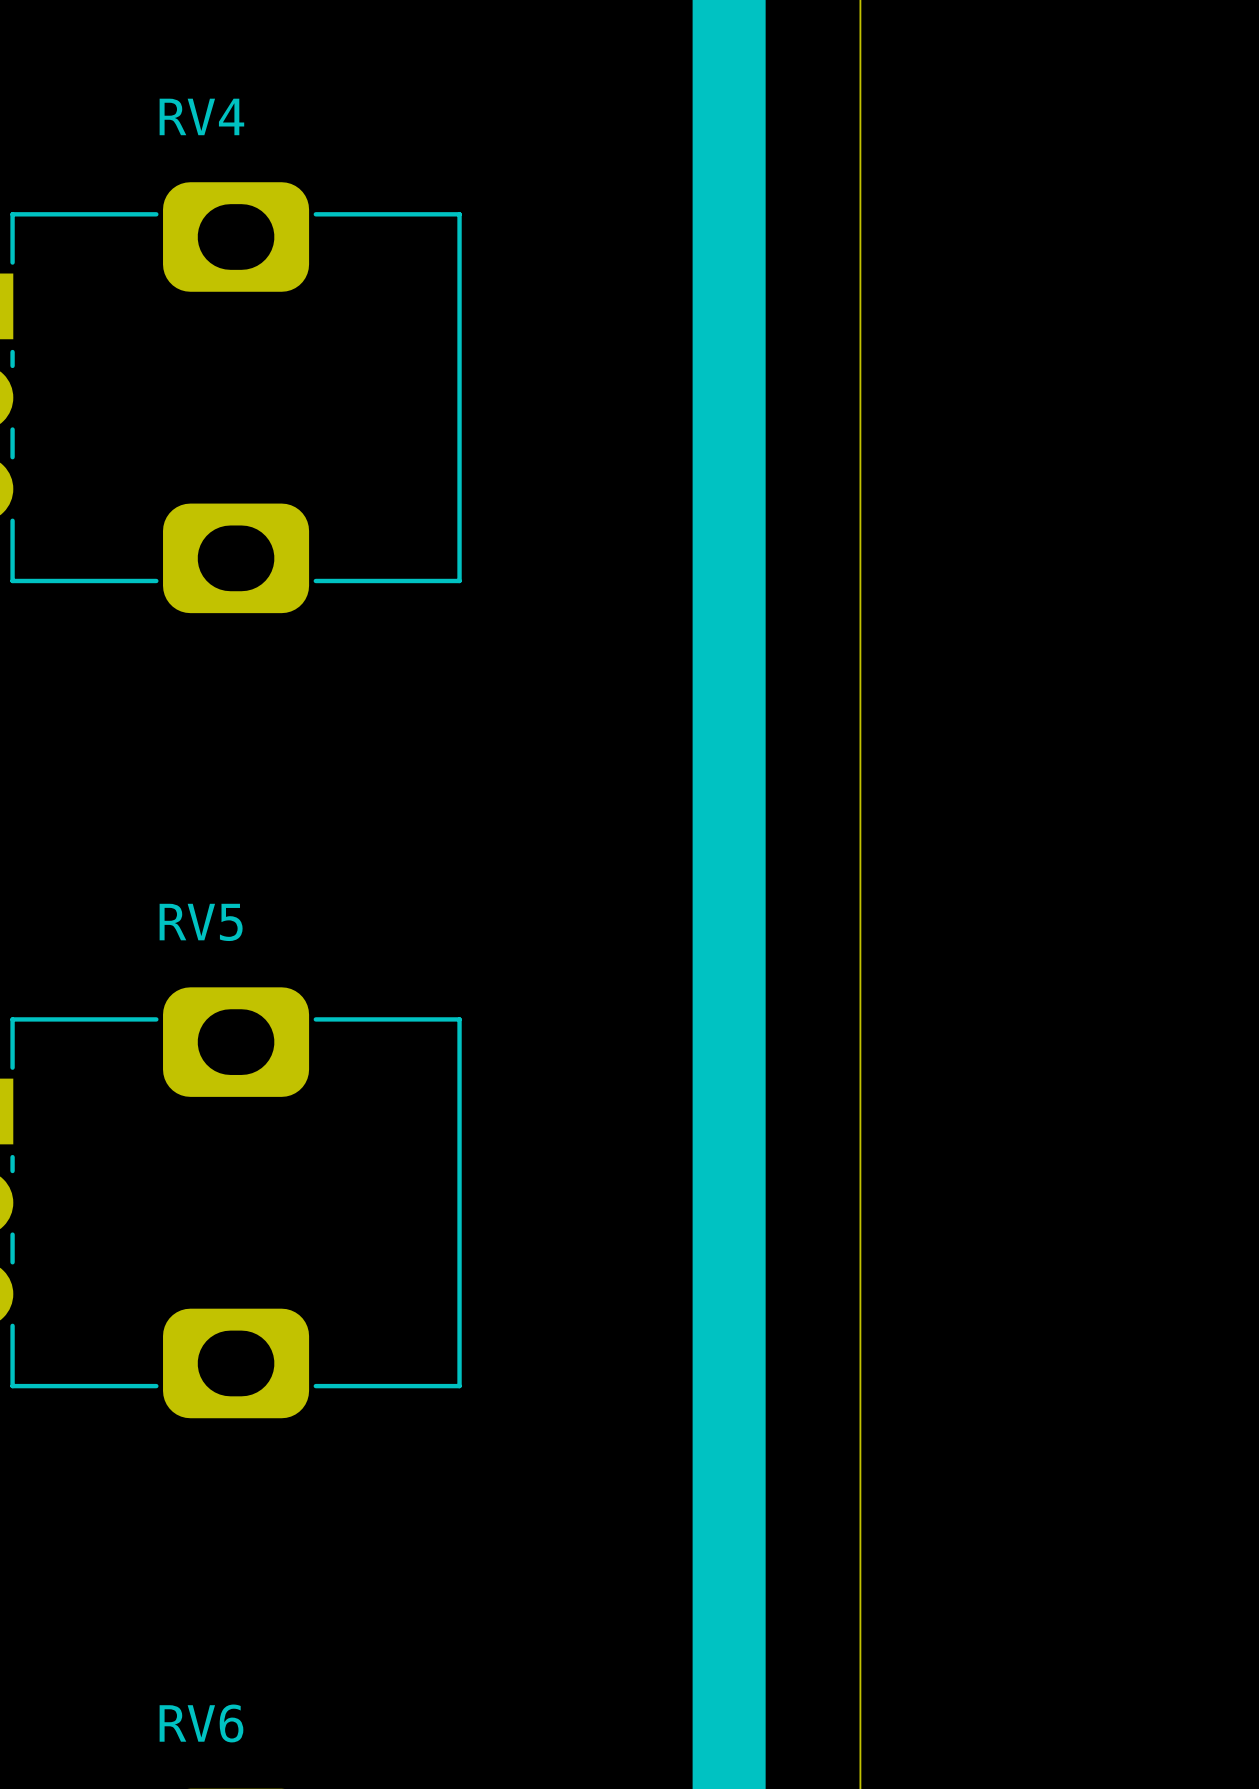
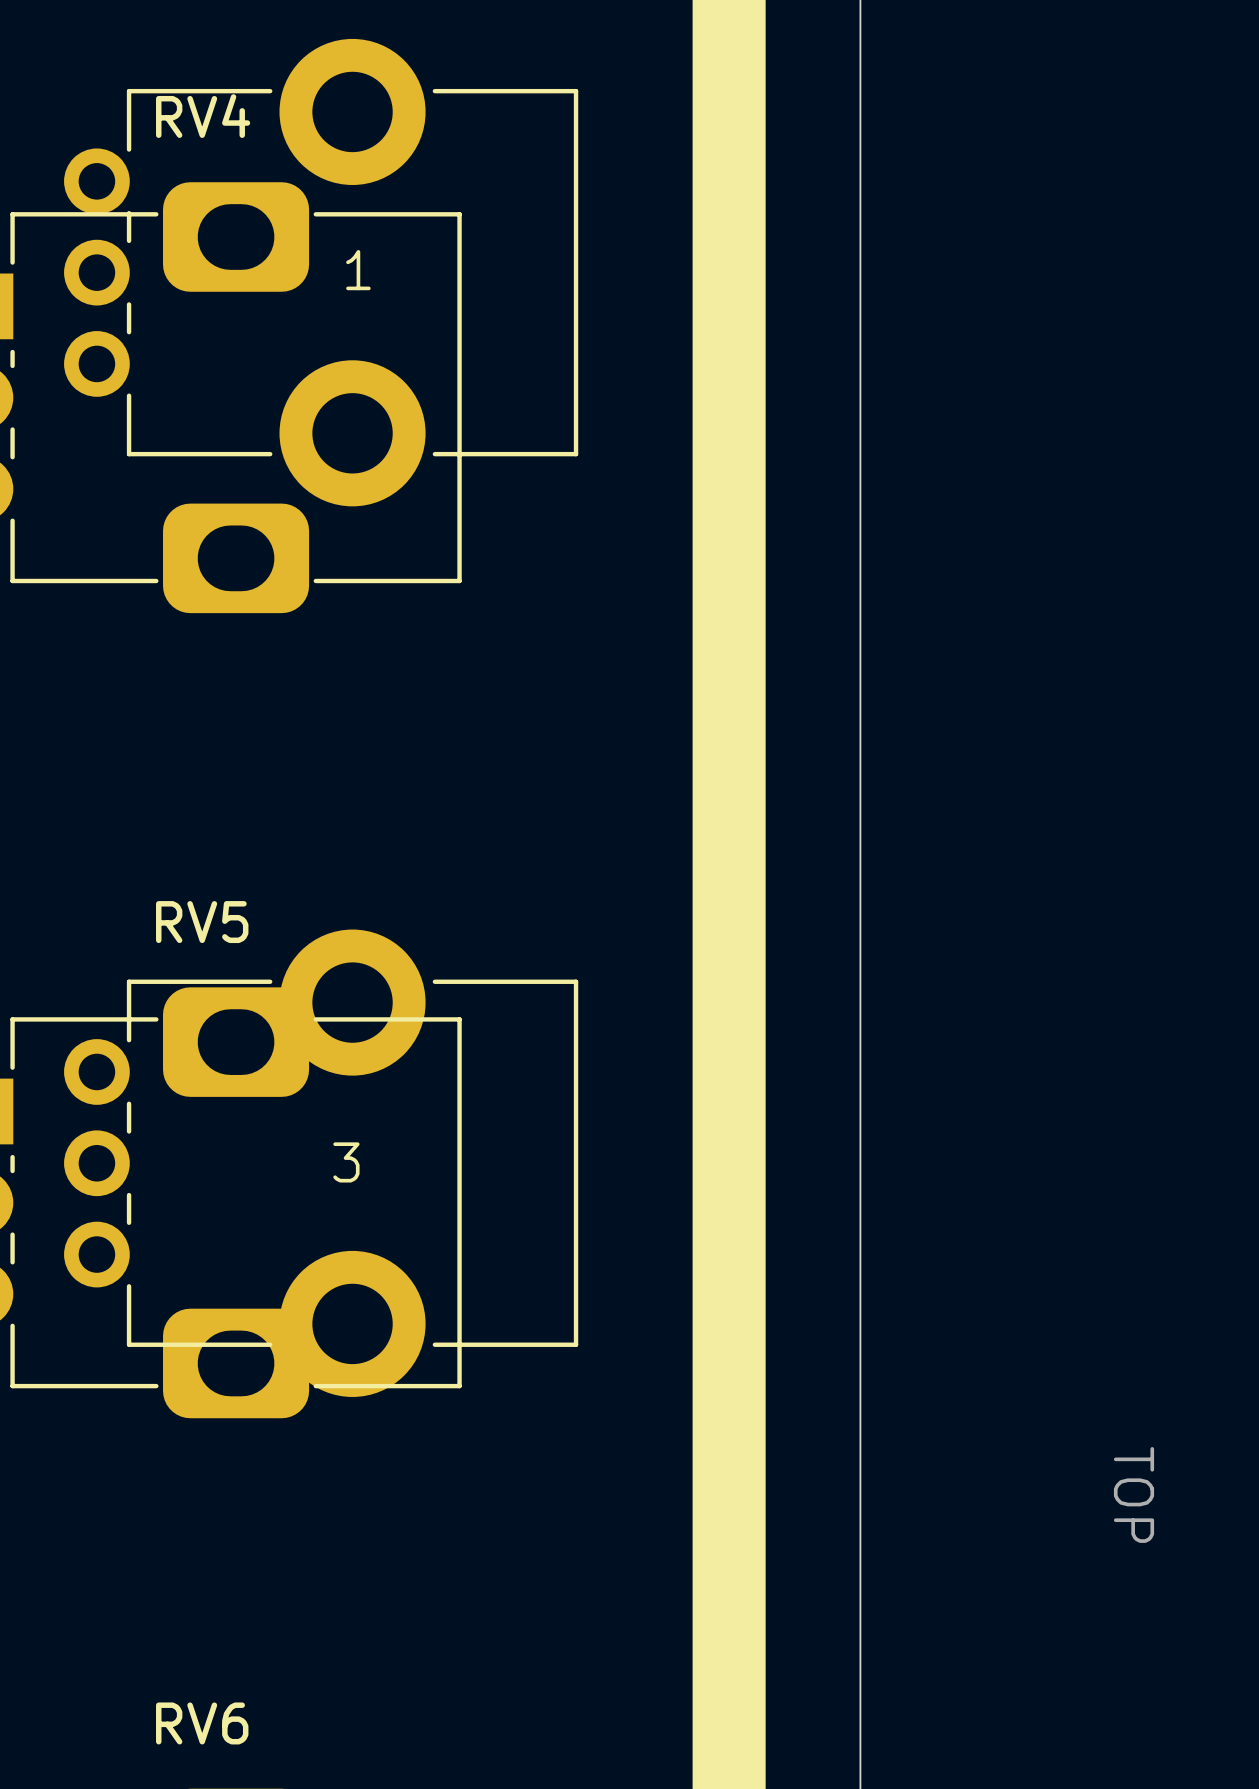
text: none -> 1 (358, 270)
part: none -> (321, 272)
text: none -> 3 (346, 1162)
part: none -> (321, 1163)
text: none -> TOP (1134, 1494)

